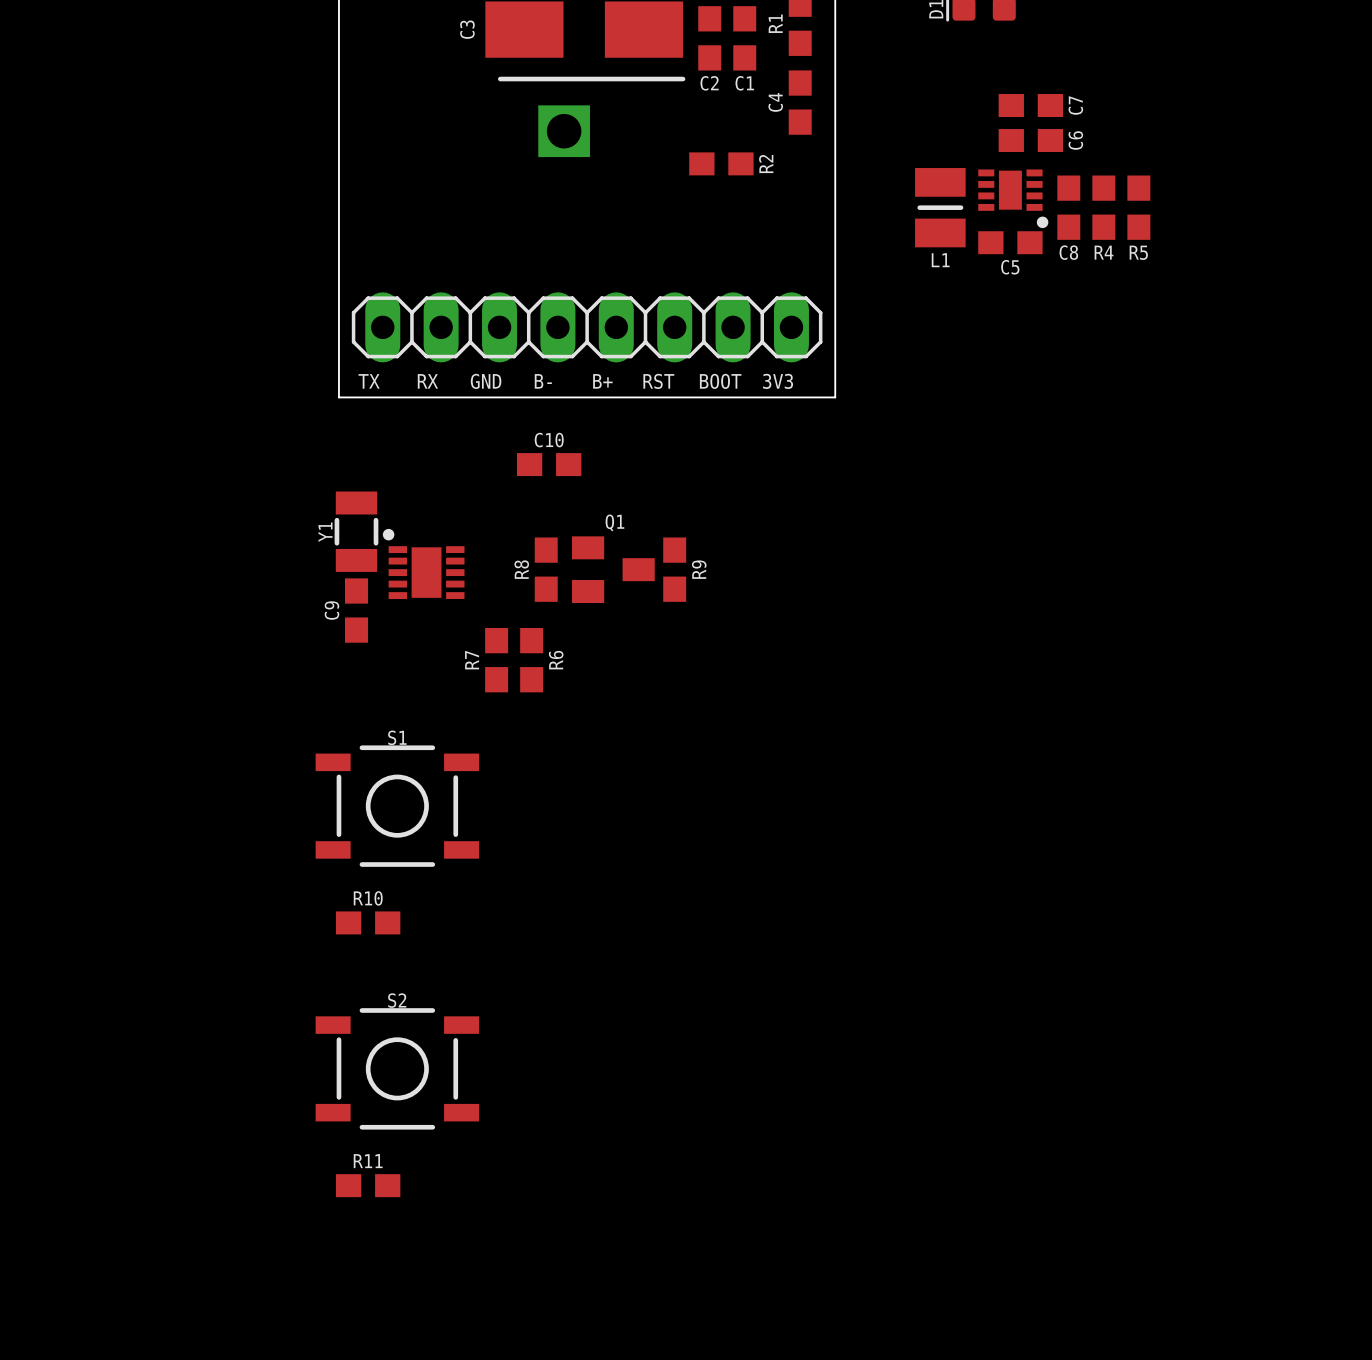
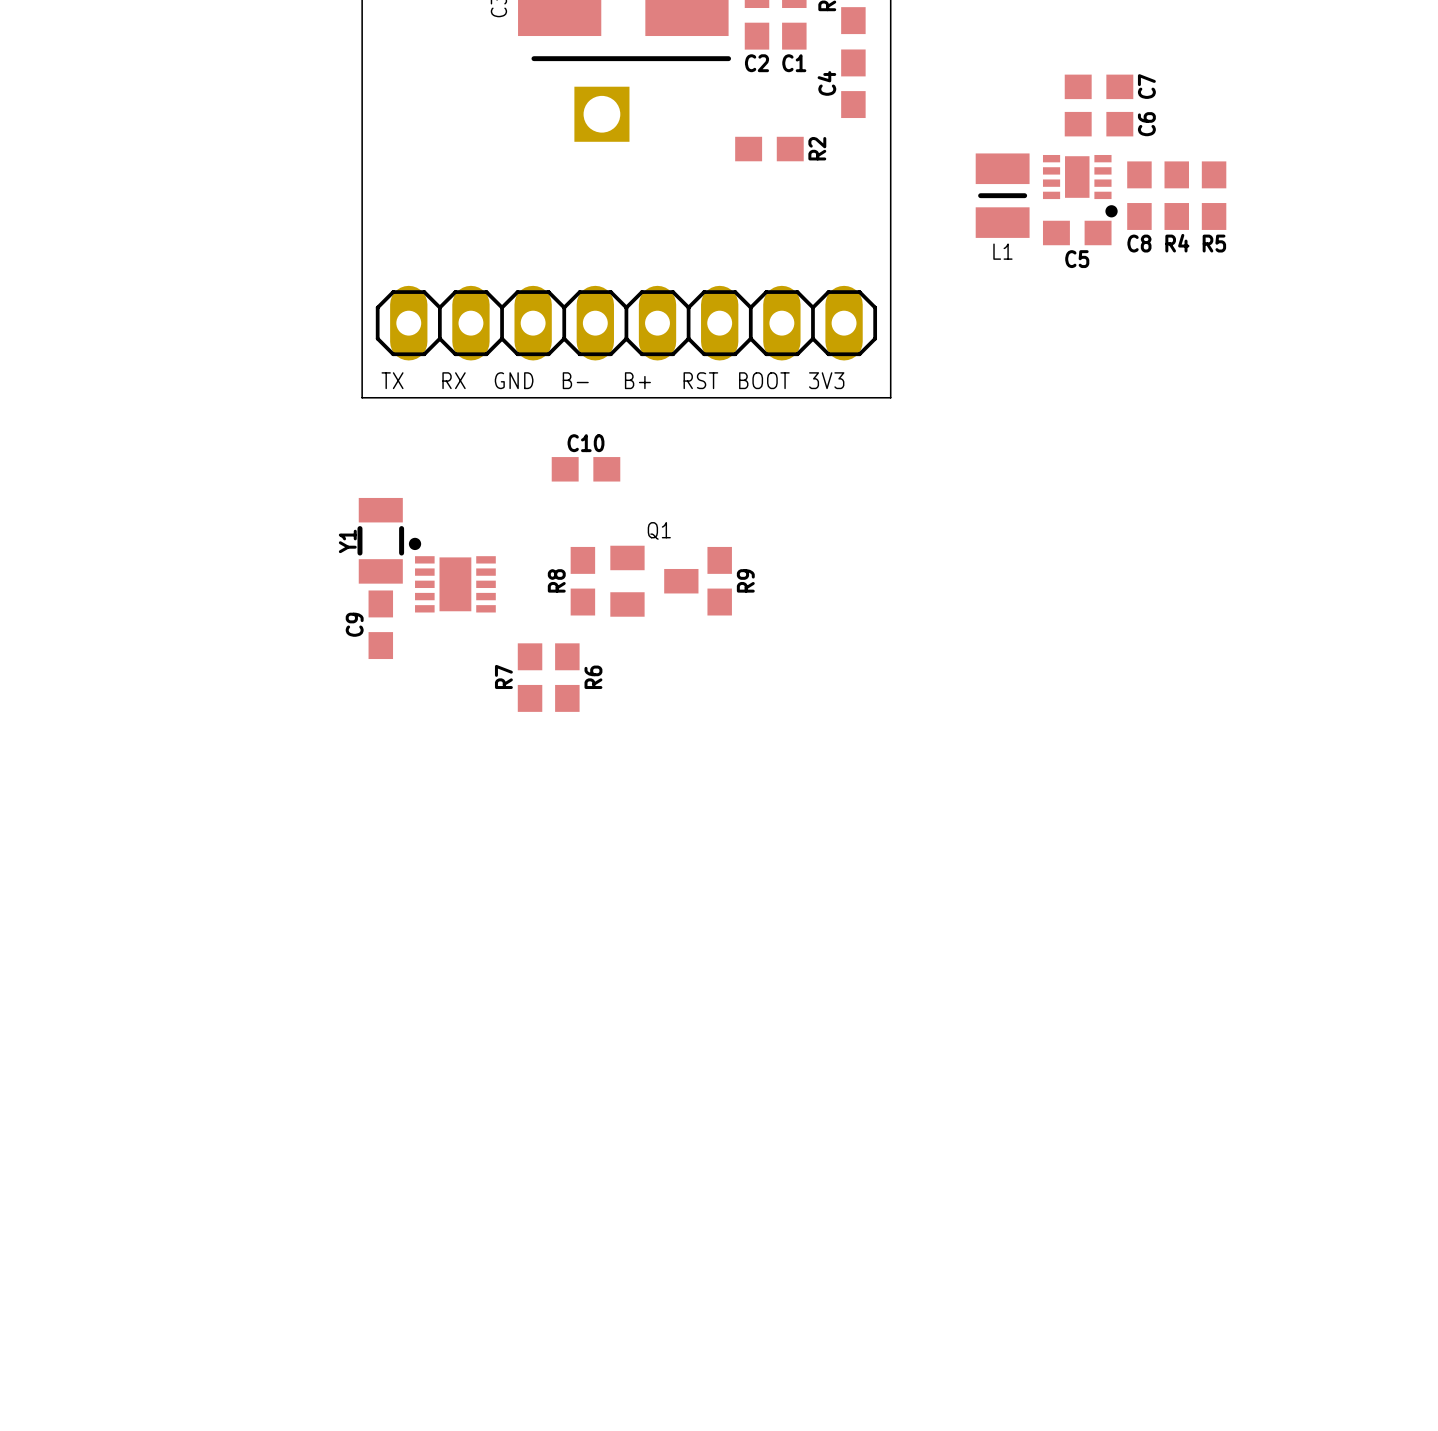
S1: (397, 806) -> none
R10: (368, 922) -> none
S2: (397, 1068) -> none
R11: (368, 1185) -> none

